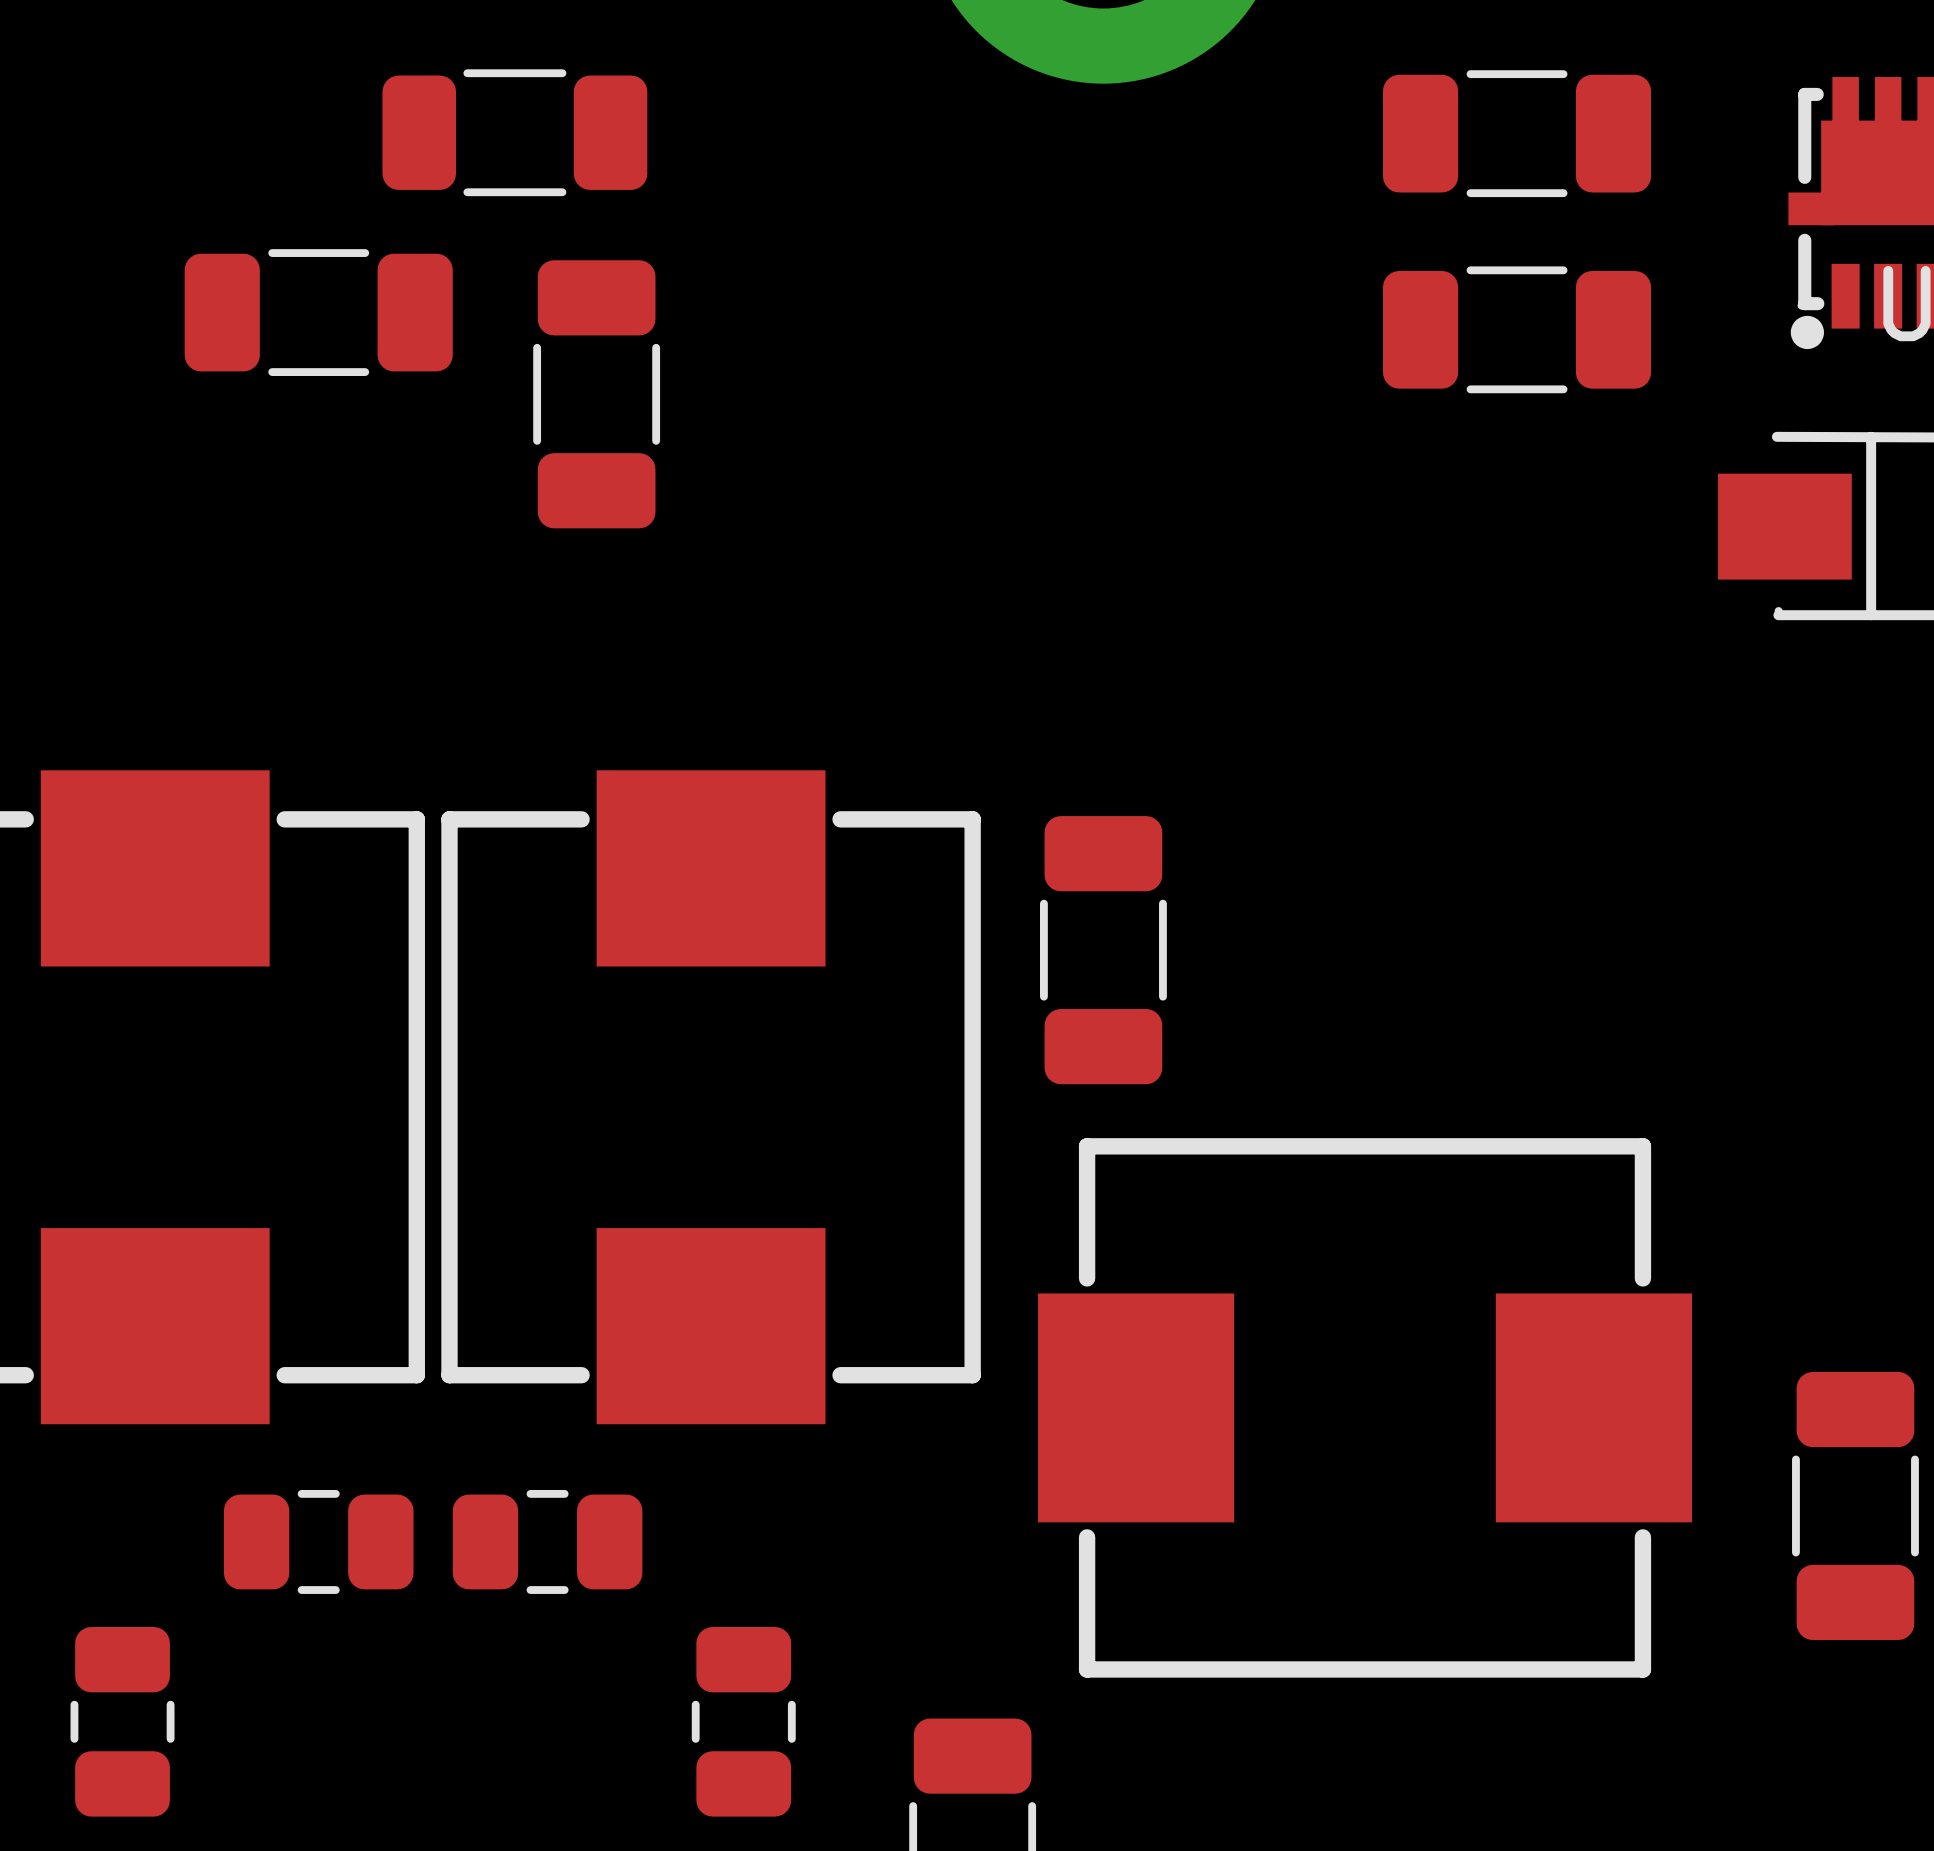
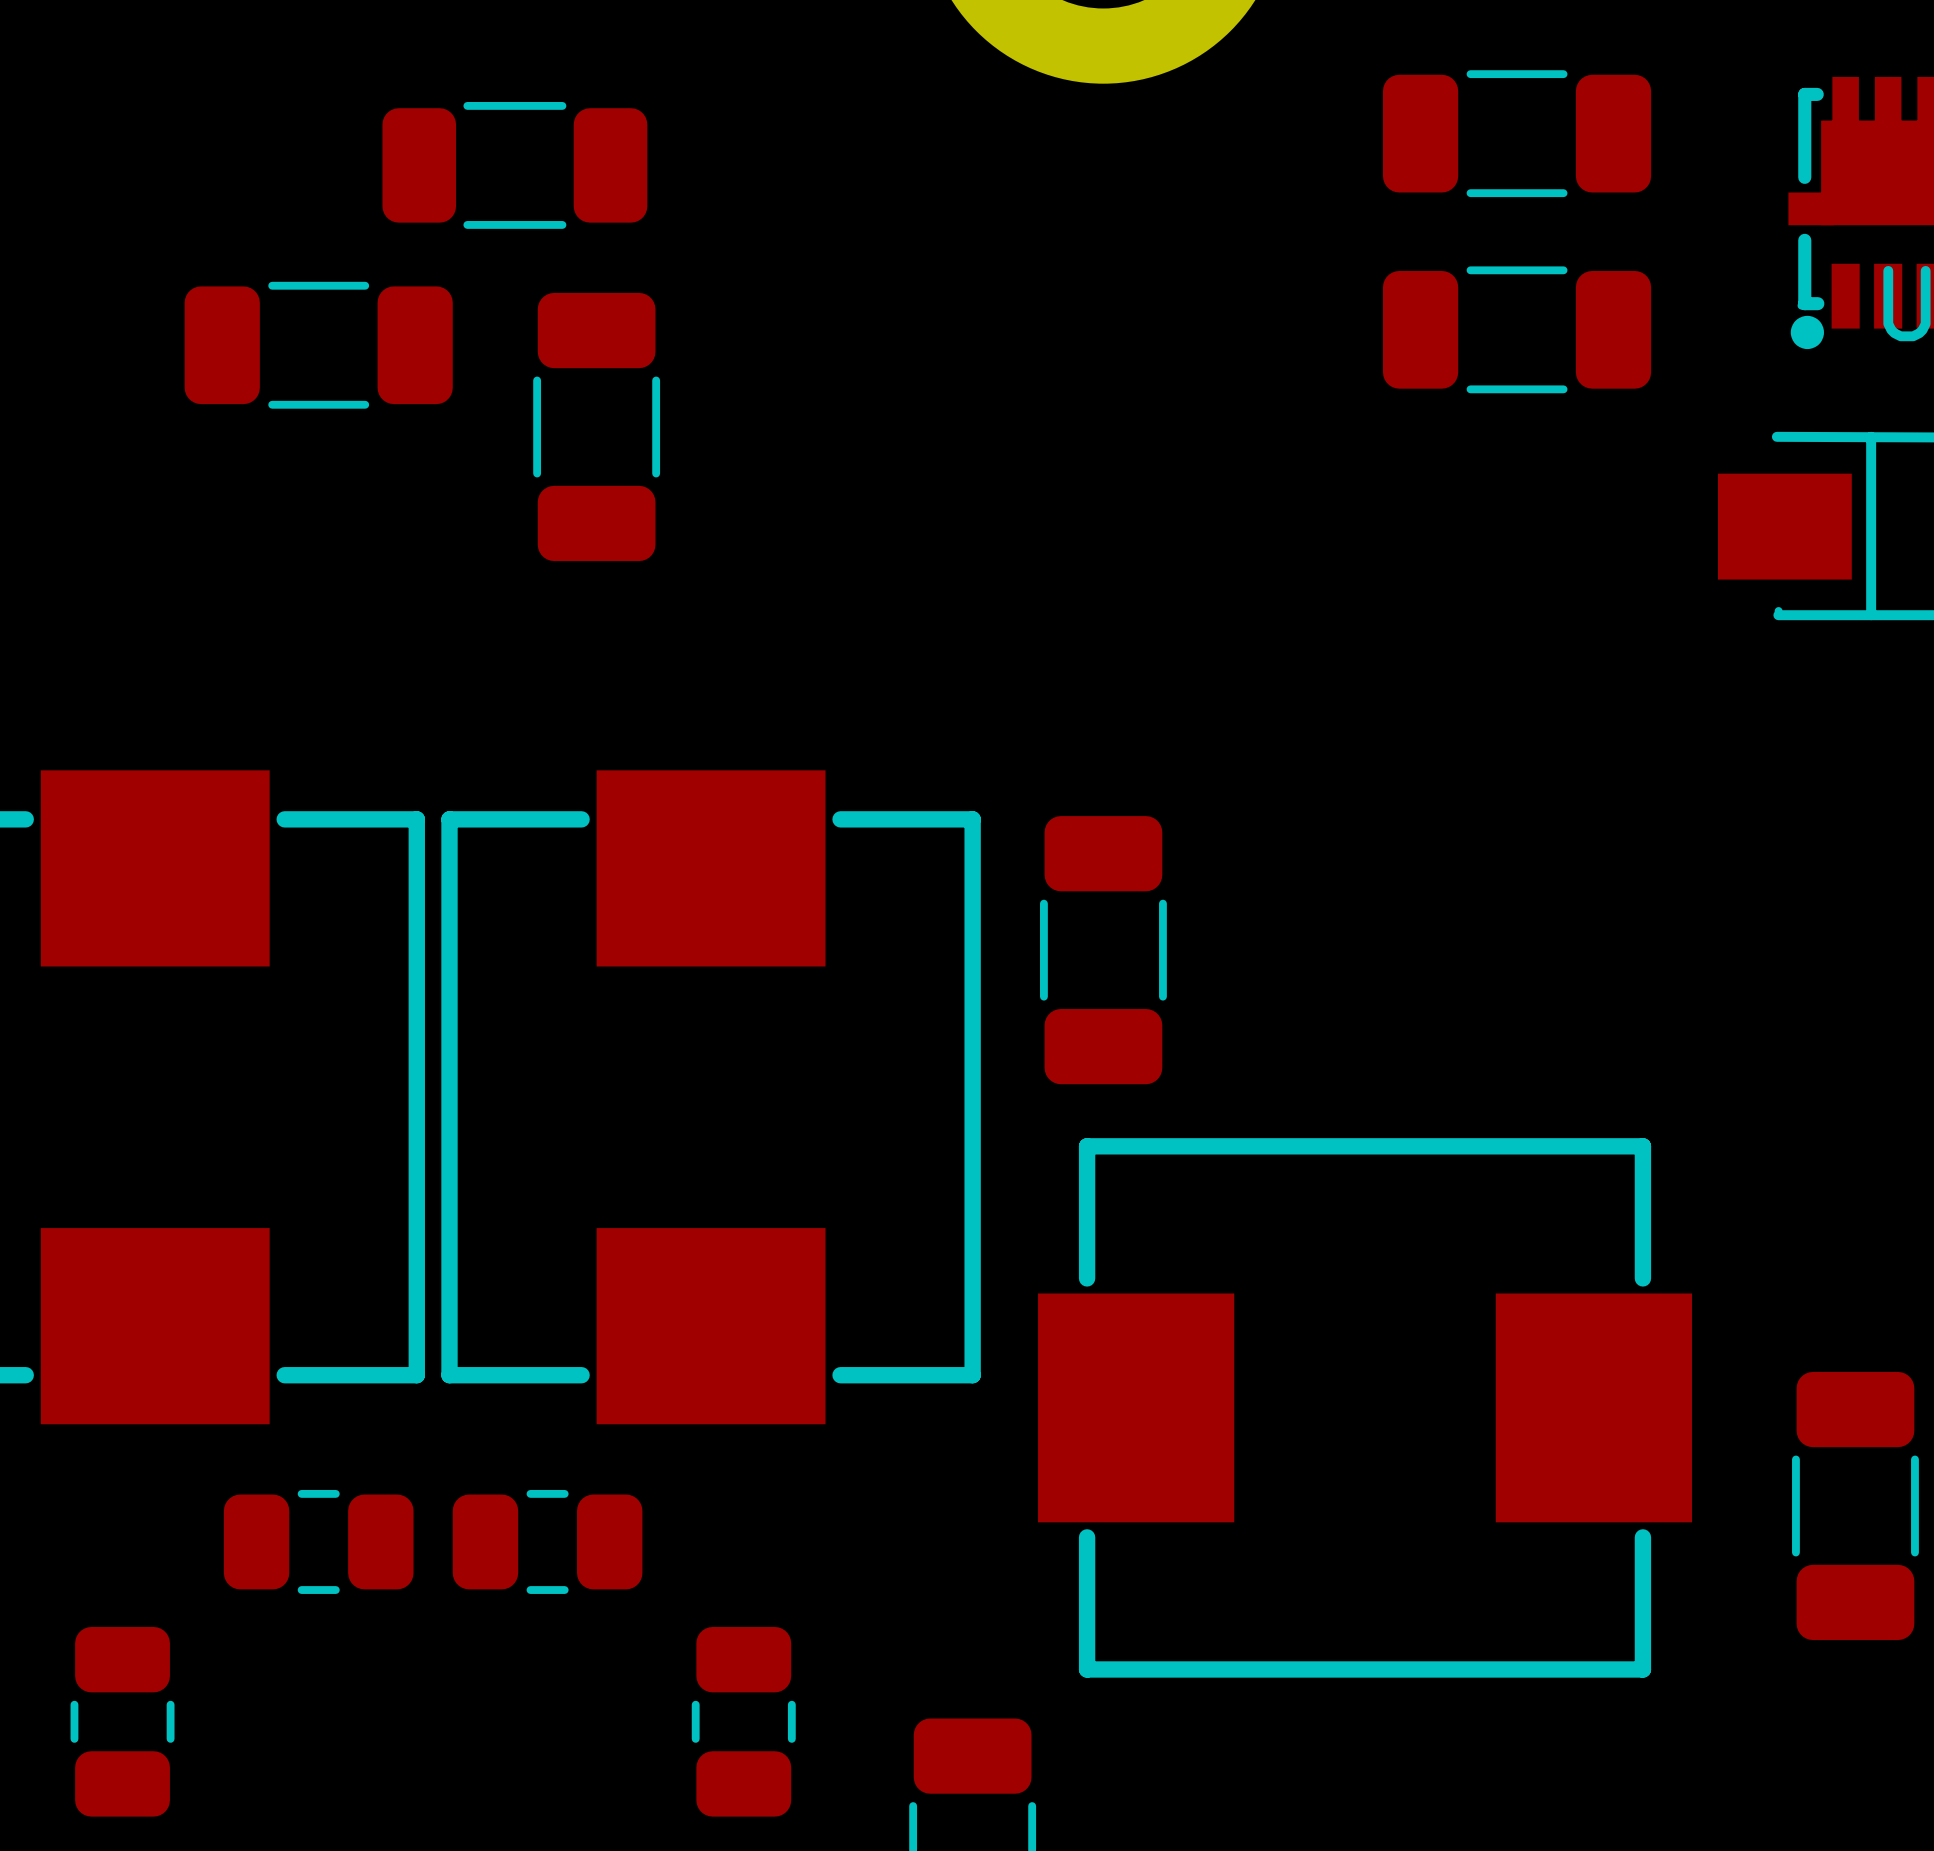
part position: (514, 132) -> (514, 165)
part position: (318, 312) -> (318, 345)
part position: (596, 394) -> (596, 427)

